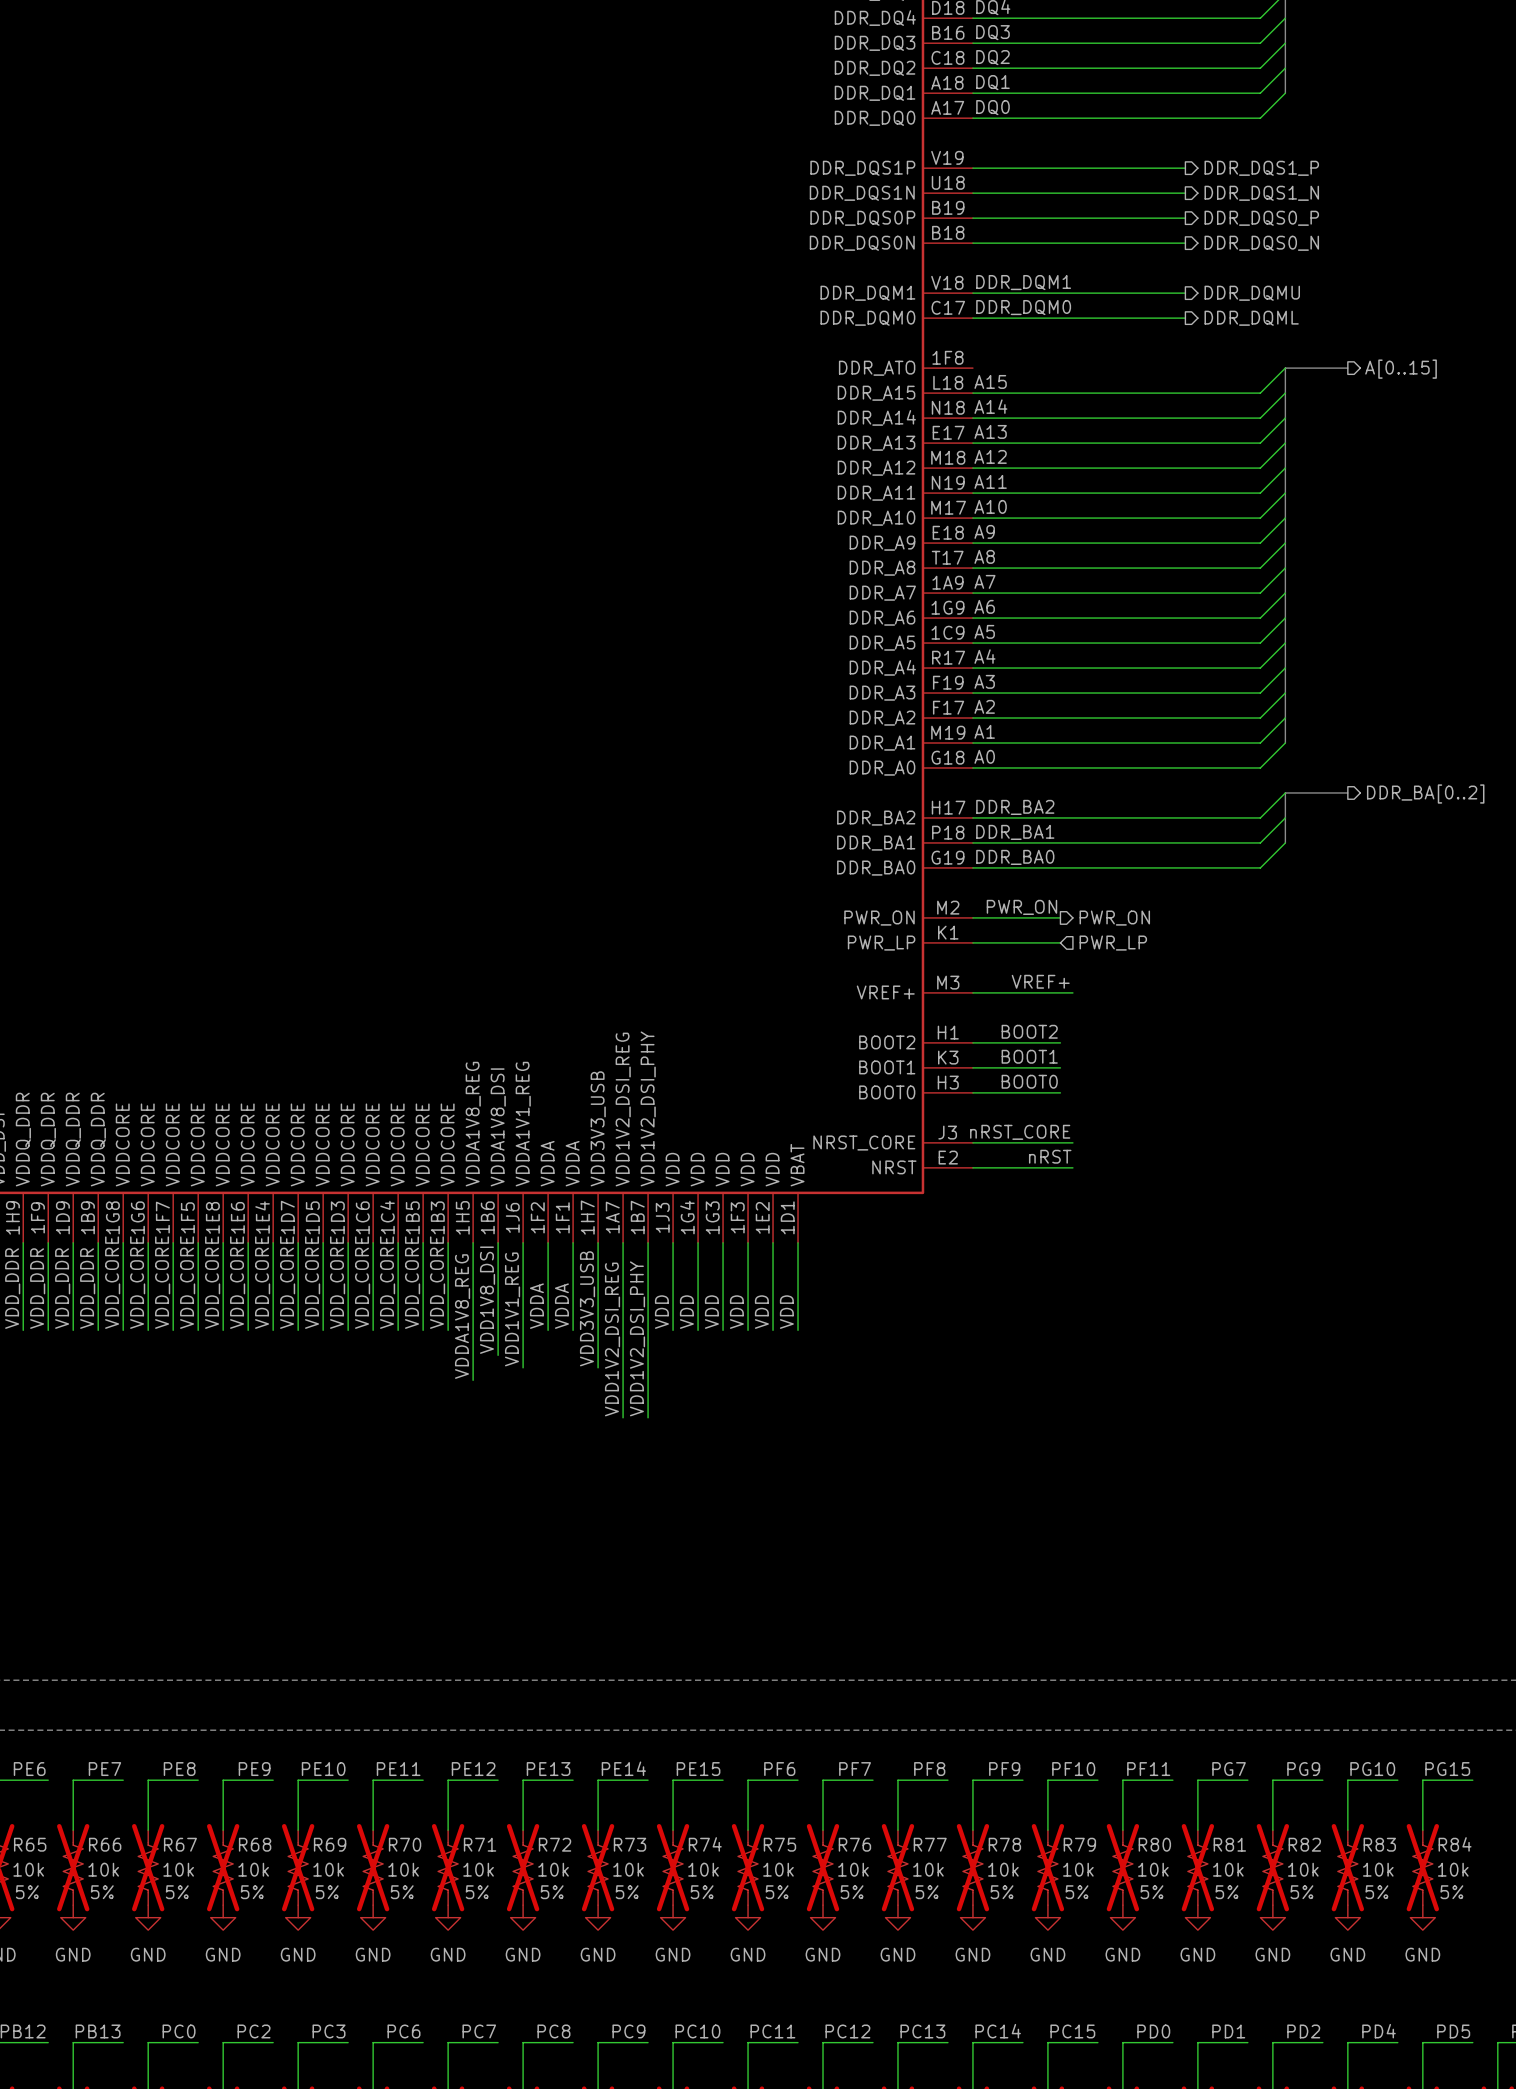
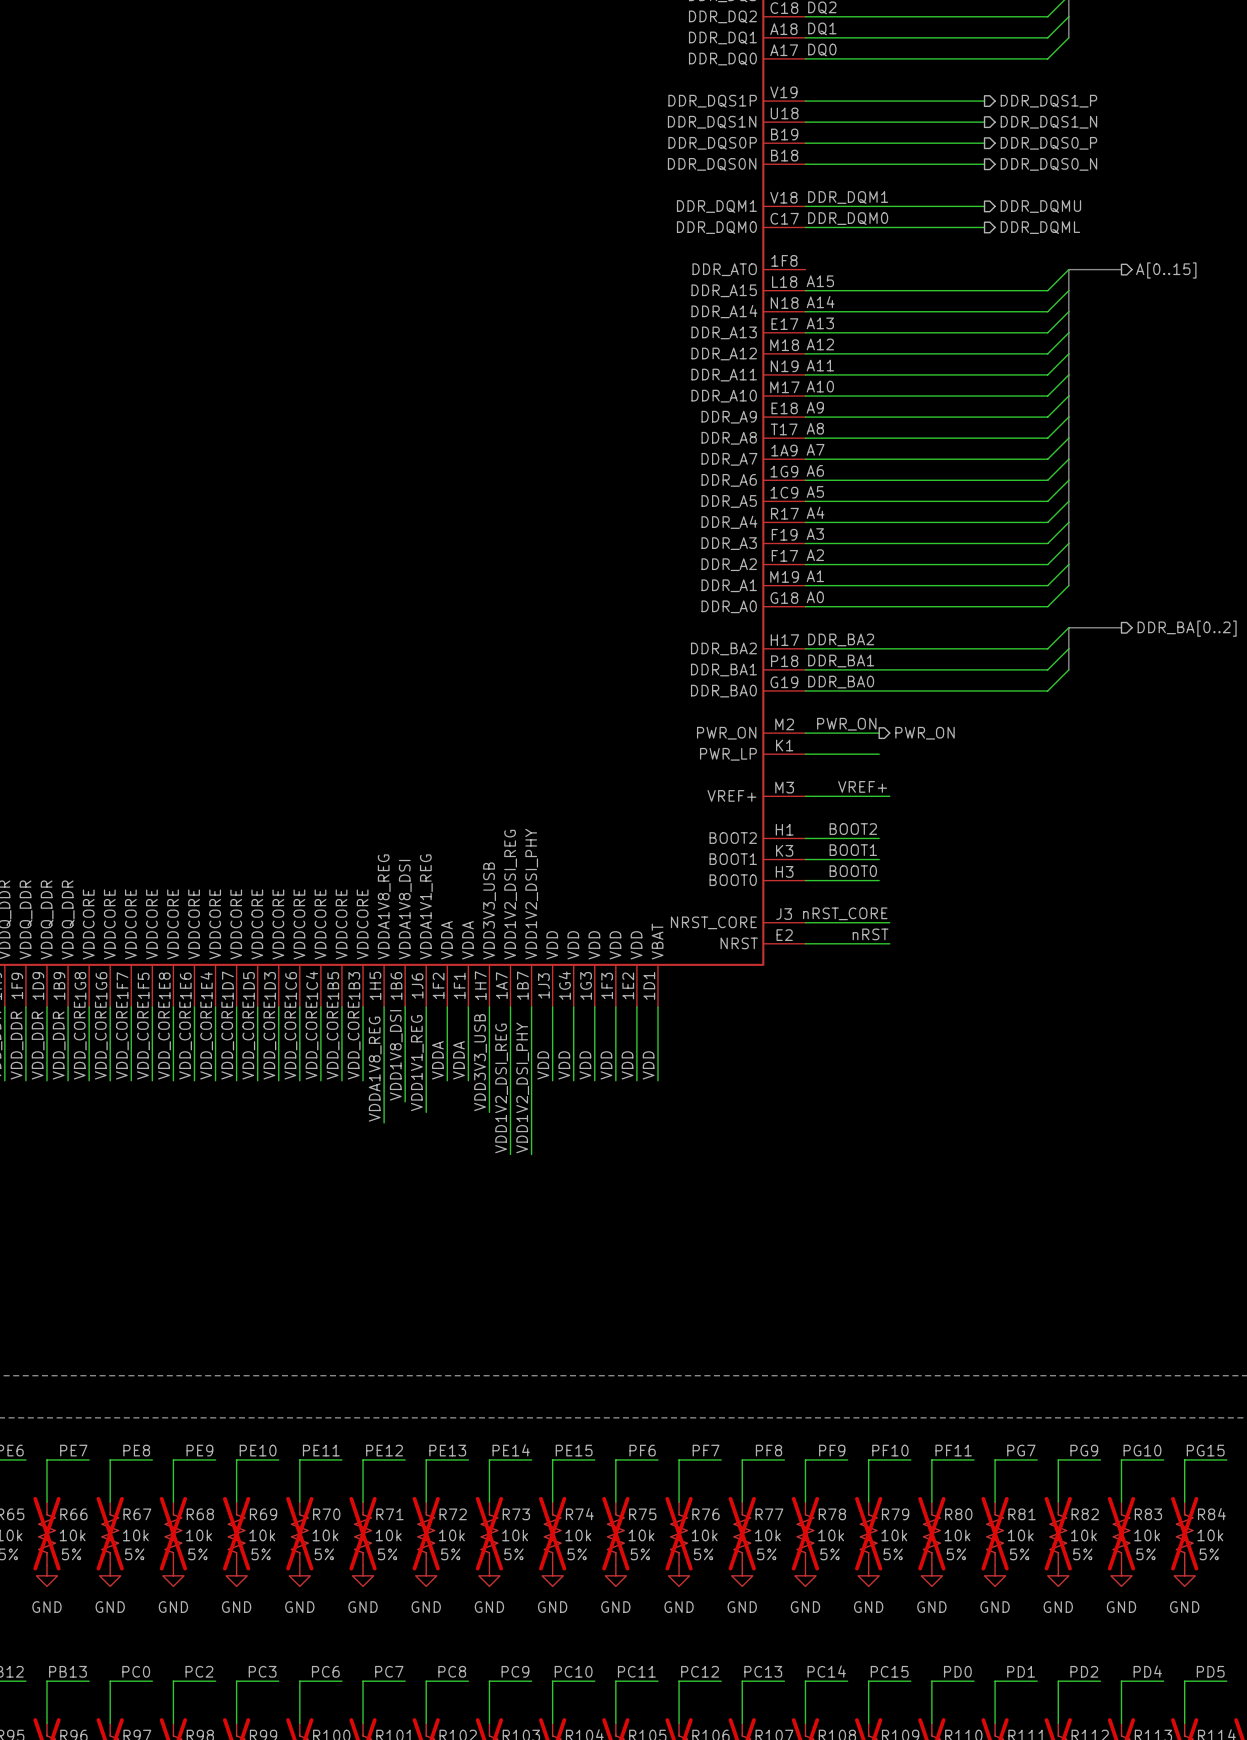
hierarchical label: PWR_LP (1113, 943) -> none

